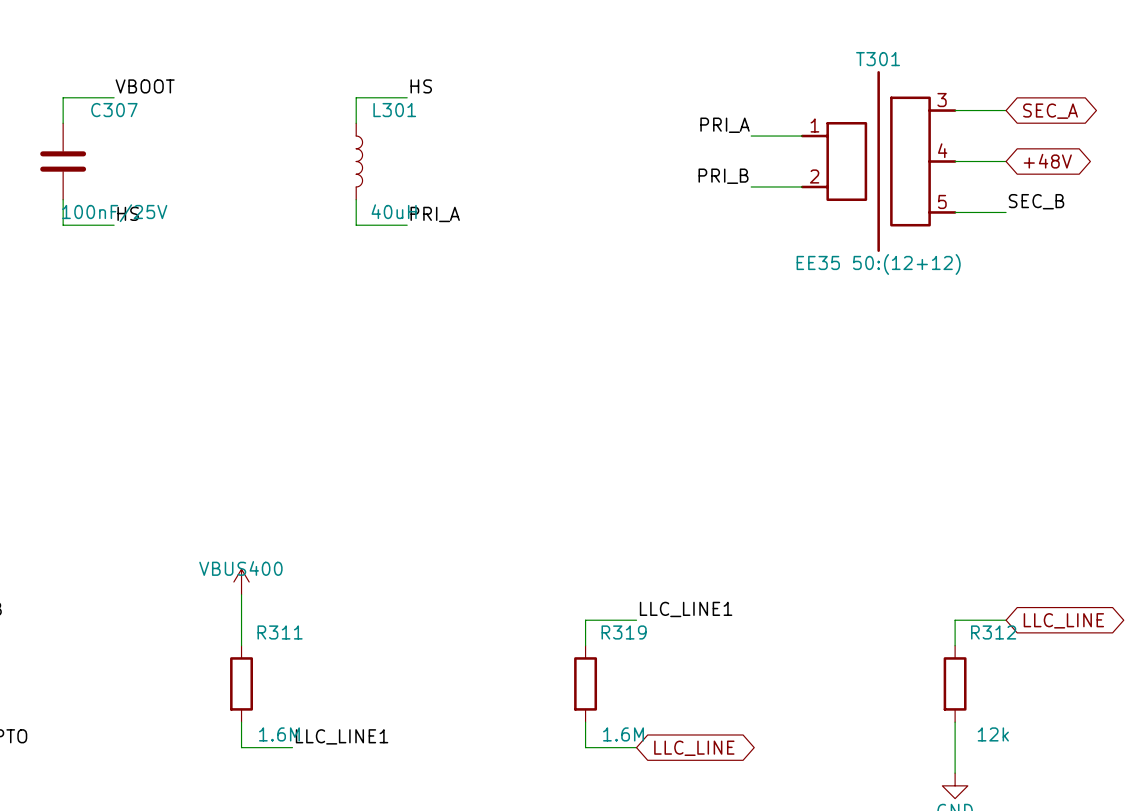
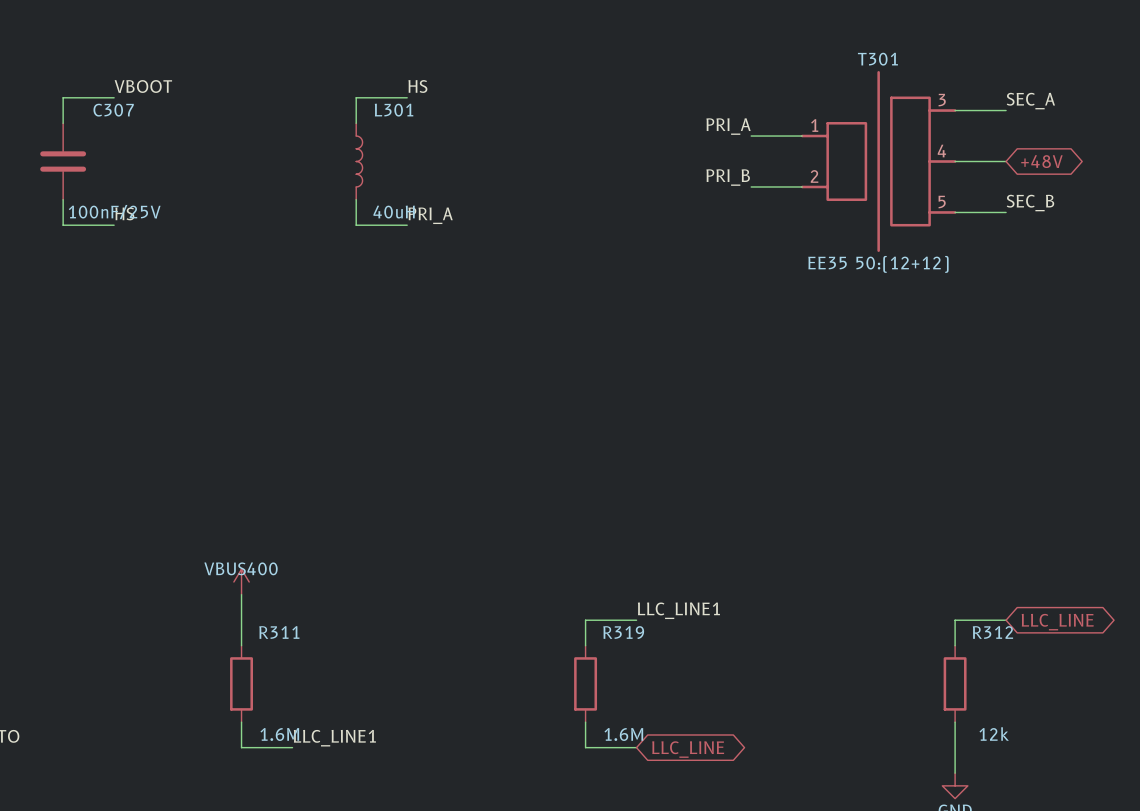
label: none -> SEC_A (1030, 101)
global label: SEC_A (1050, 111) -> none

